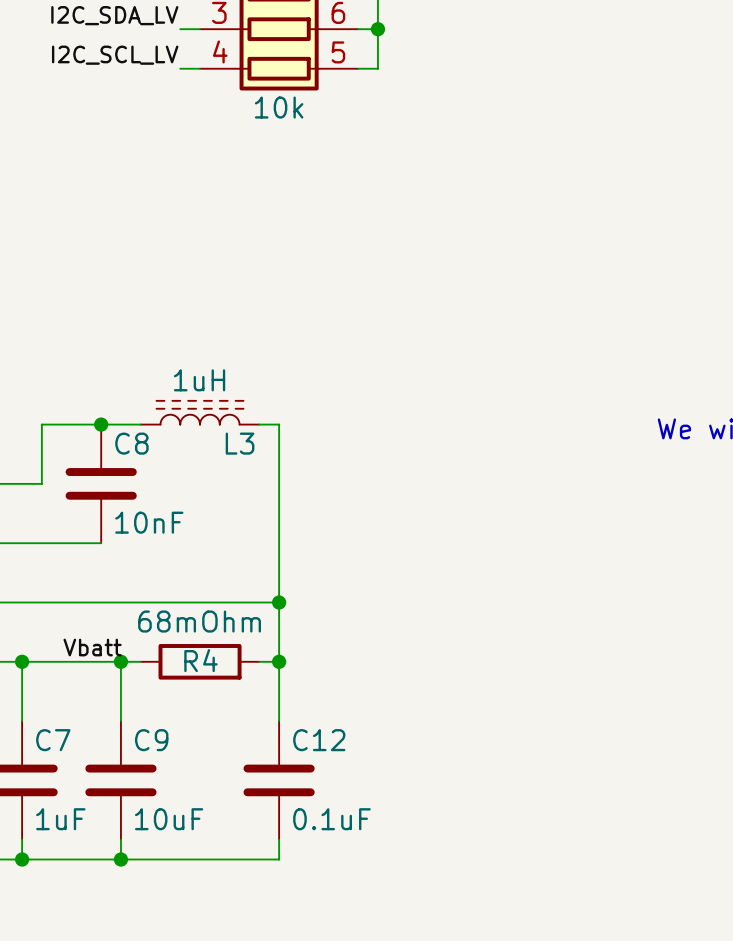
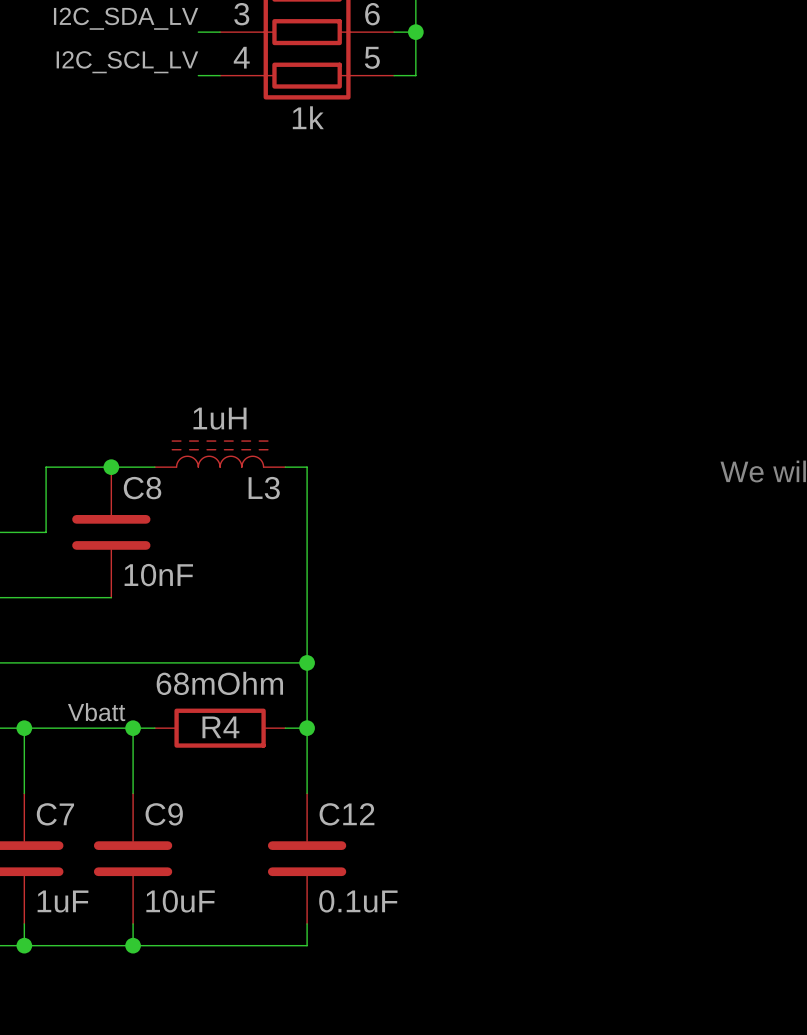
part value: 10k (279, 107) -> 1k (308, 117)

